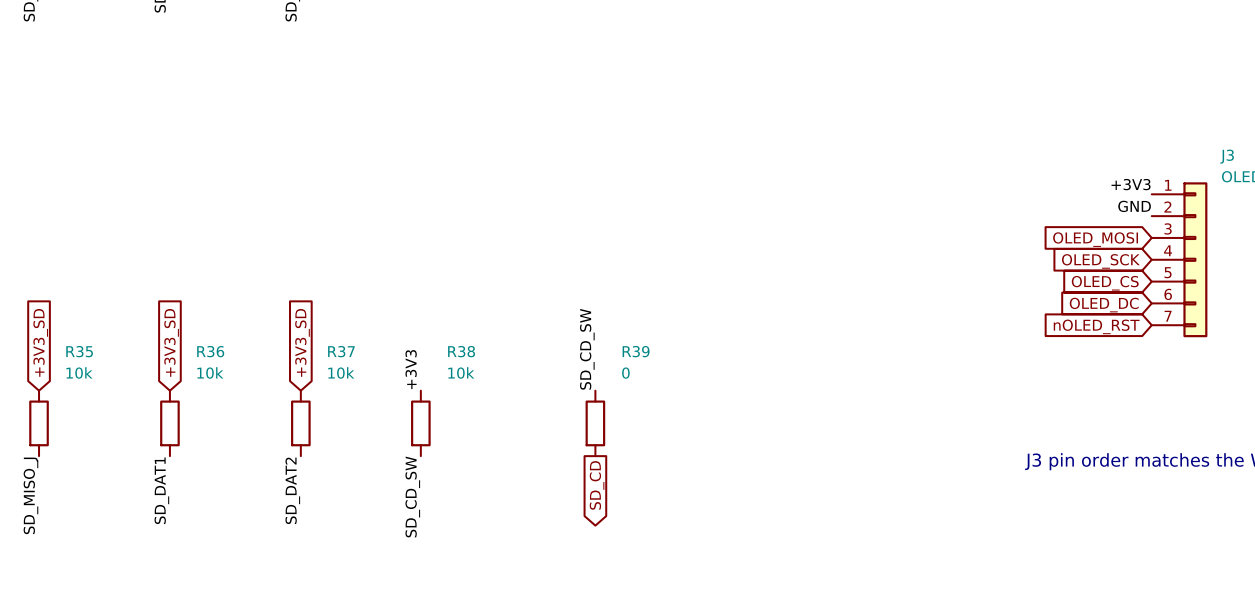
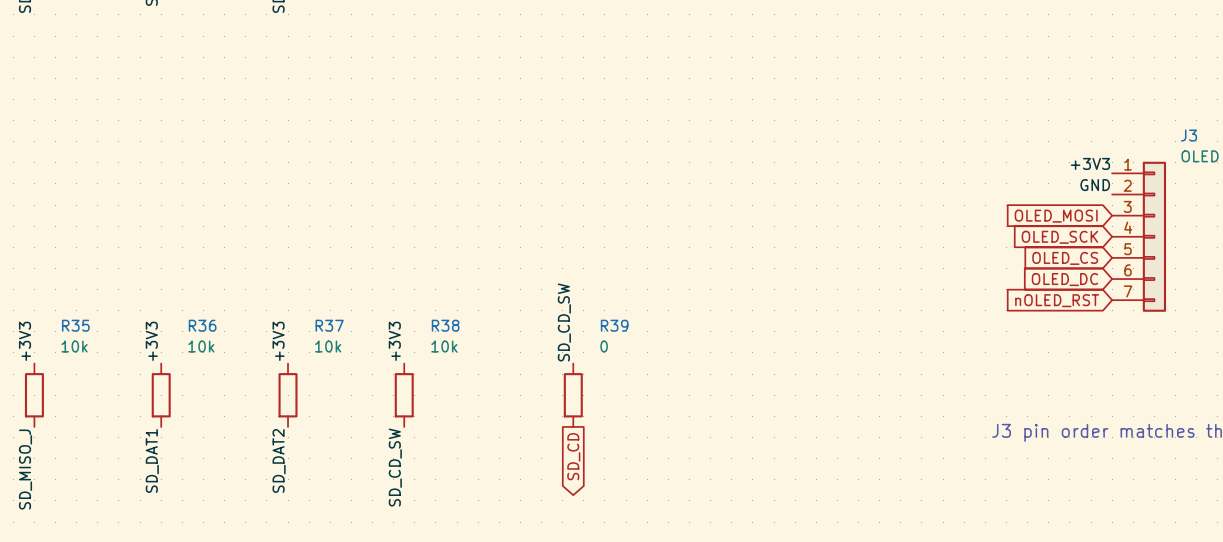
global label: +3V3_SD (40, 342) -> none
global label: +3V3_SD (171, 342) -> none
global label: +3V3_SD (302, 342) -> none
label: none -> +3V3 (25, 341)
label: none -> +3V3 (151, 341)
label: none -> +3V3 (278, 341)

